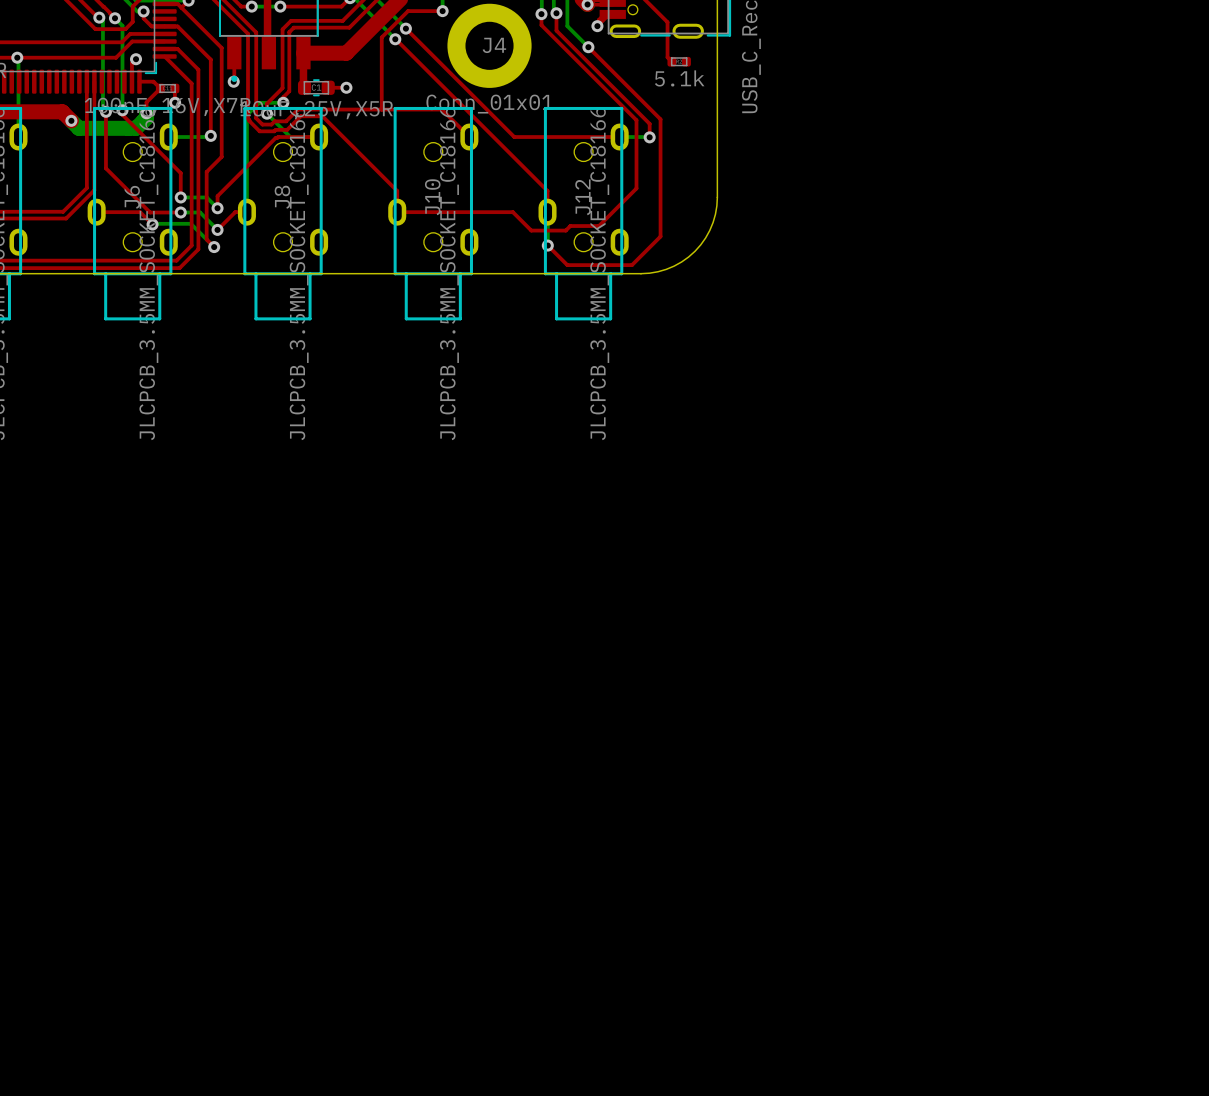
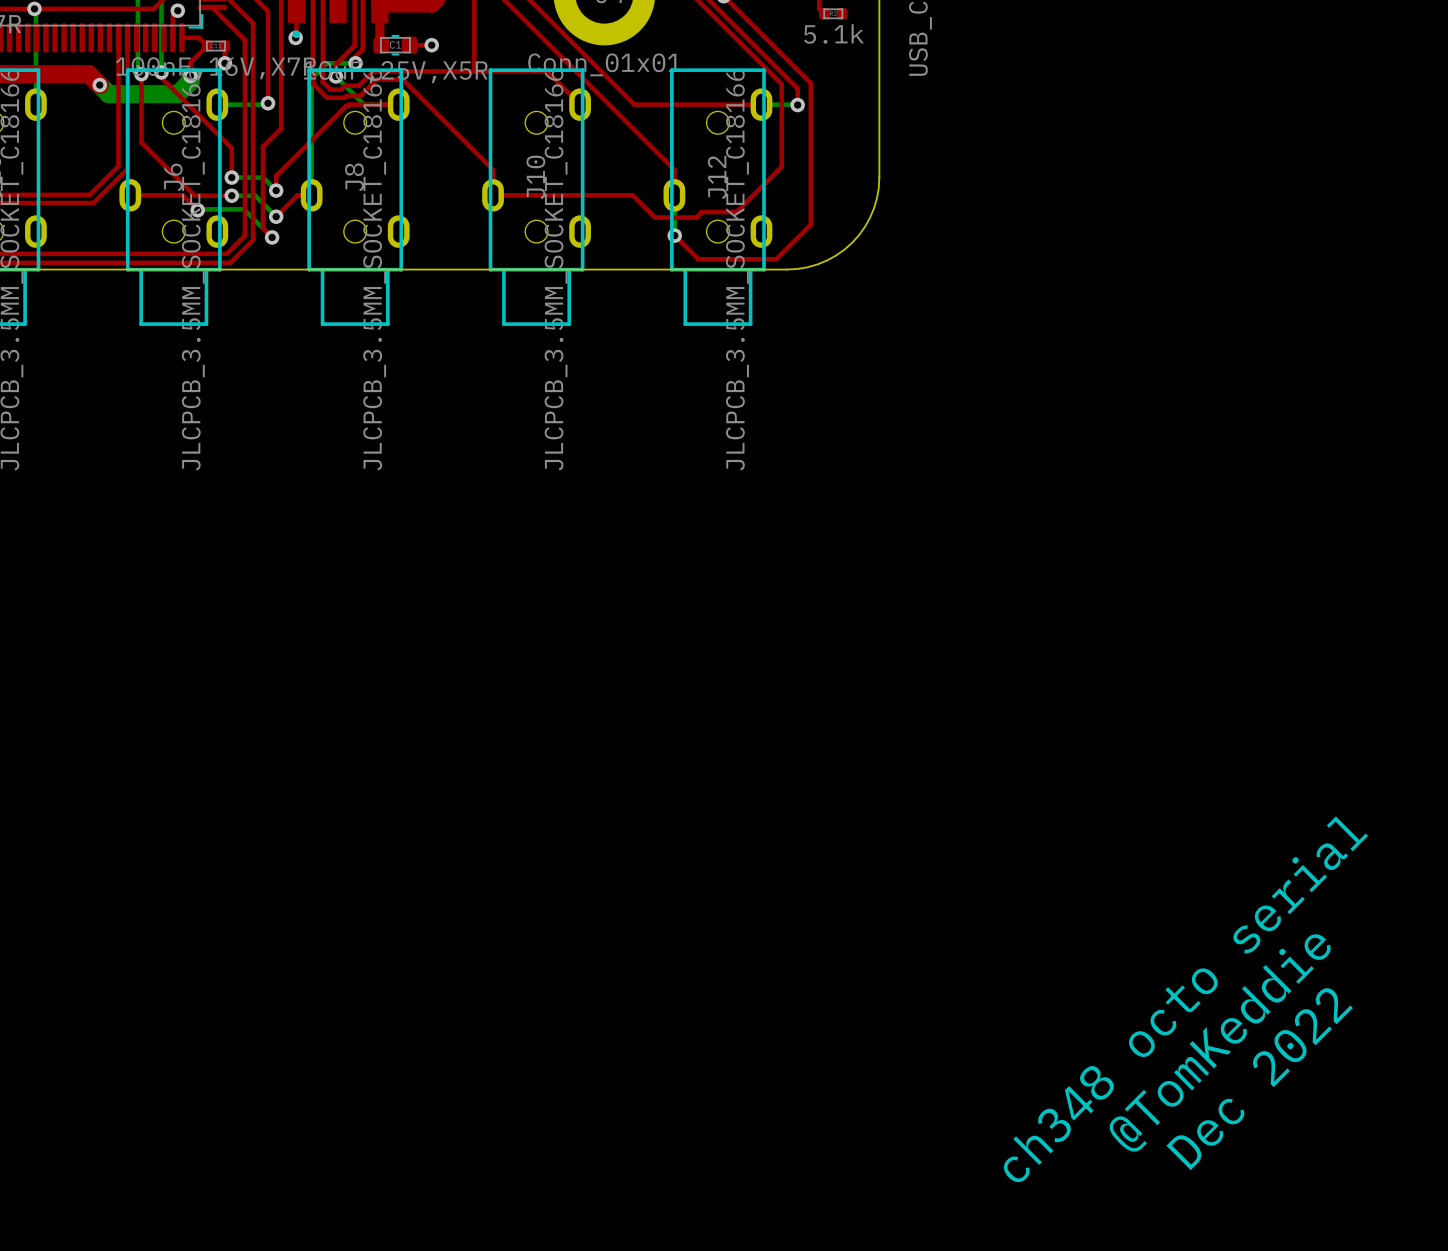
text: none -> ch348 octo serial (1185, 999)
text: none -> @TomKeddie (1220, 1043)
text: none -> Dec 2022 (1259, 1079)

